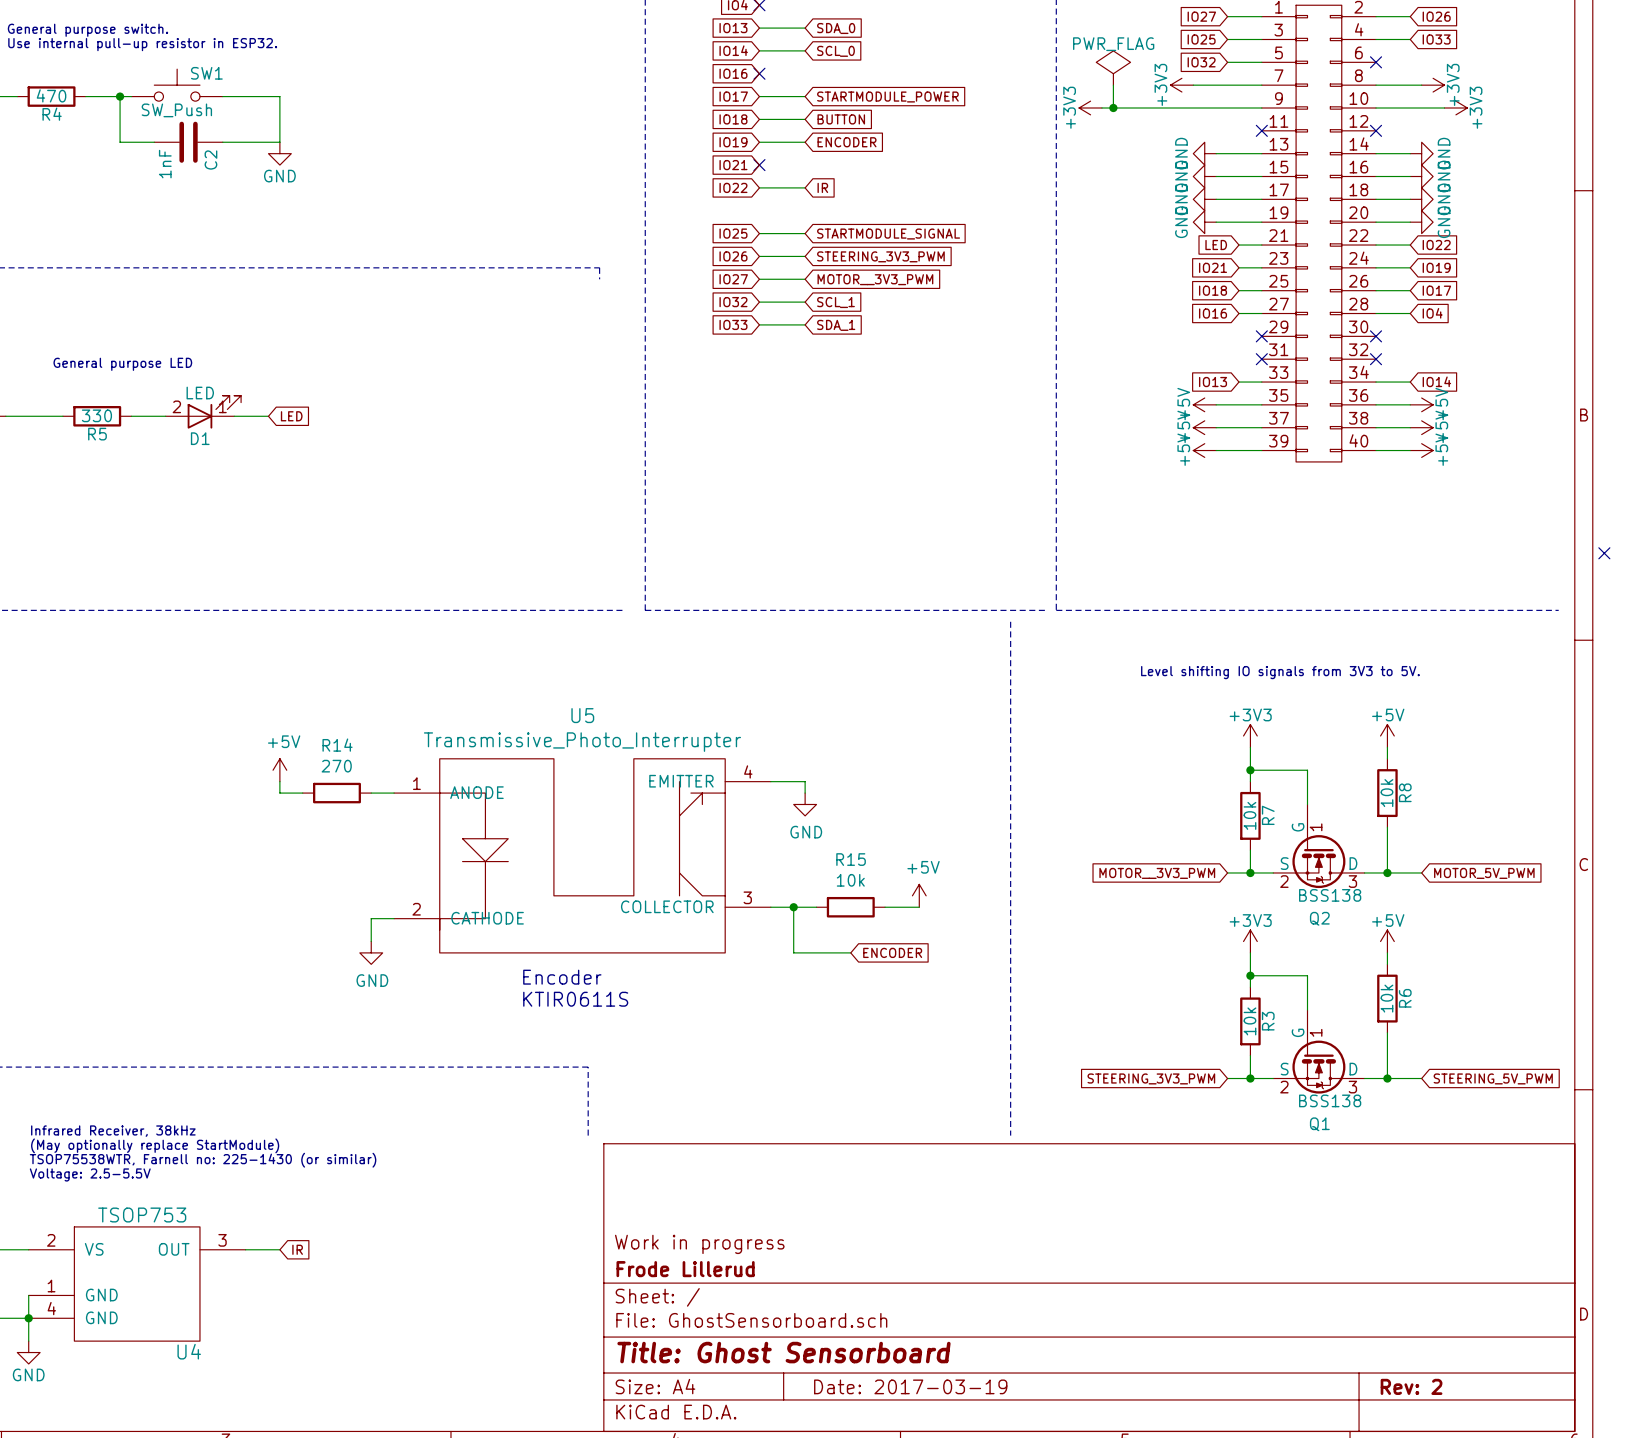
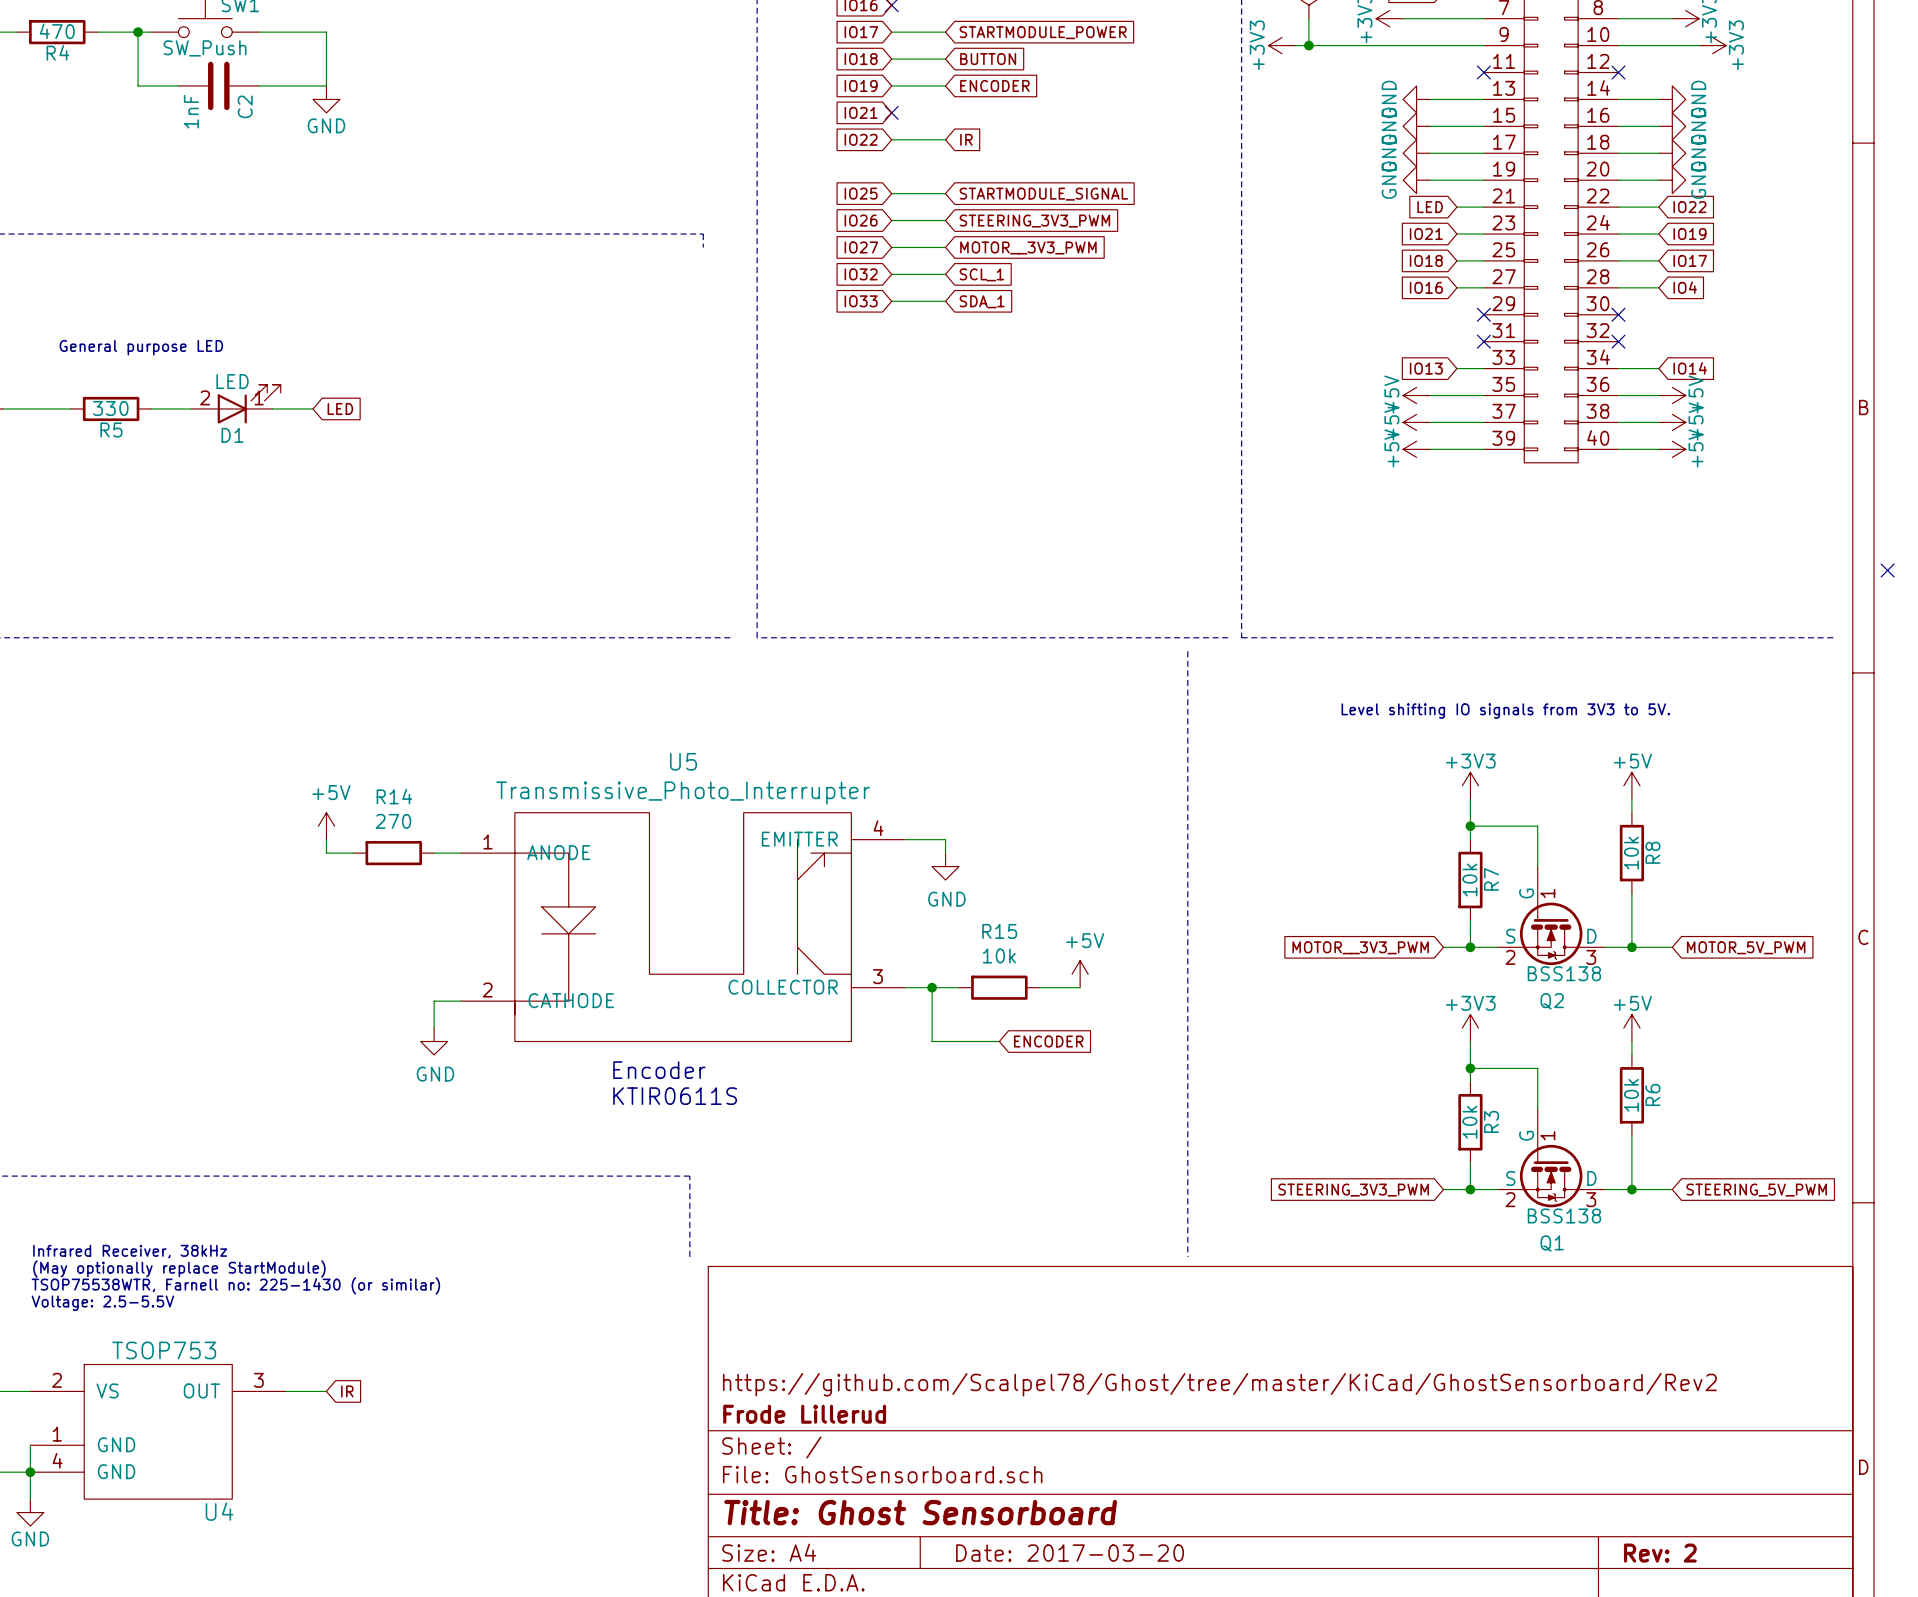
title block: Work in progress (699, 1244) -> https://github.com/Scalpel78/Ghost/tree/master/KiCad/GhostSensorboard/Rev2 (1219, 1384)
title block: Date: 2017-03-19 (910, 1386) -> Date: 2017-03-20 (1070, 1553)

